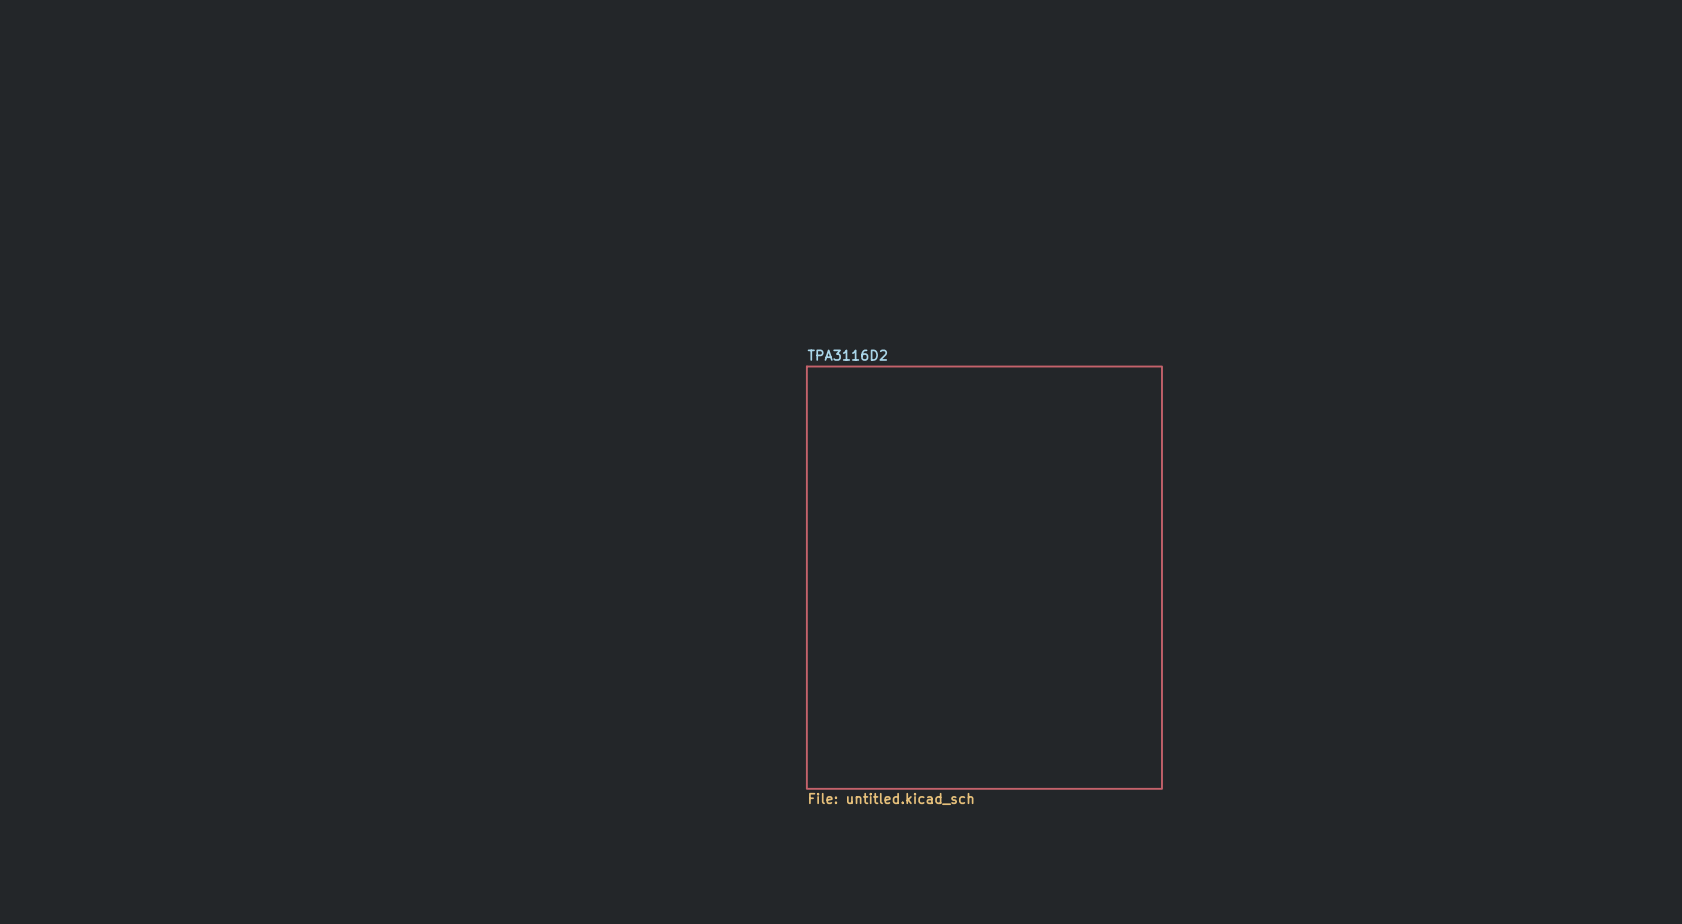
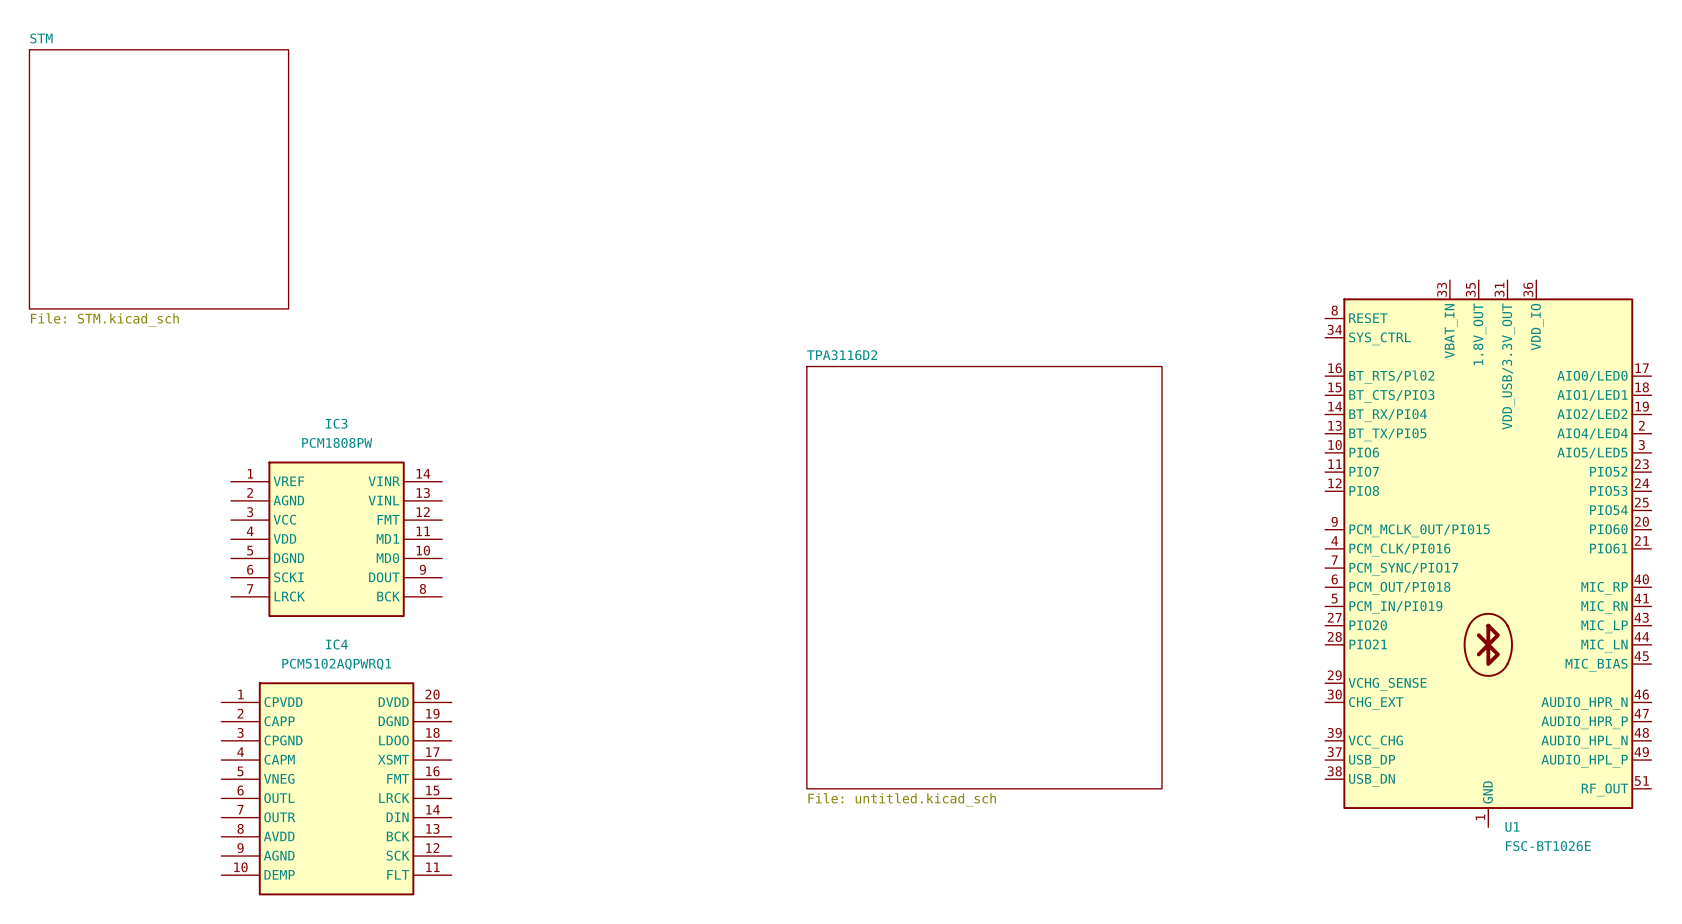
sheet STM: none -> File: STM.kicad_sch (159, 179)
IC3: none -> PCM1808PW (336, 539)
U1: none -> FSC-BT1026E (1488, 553)
IC4: none -> PCM5102AQPWRQ1 (336, 788)

